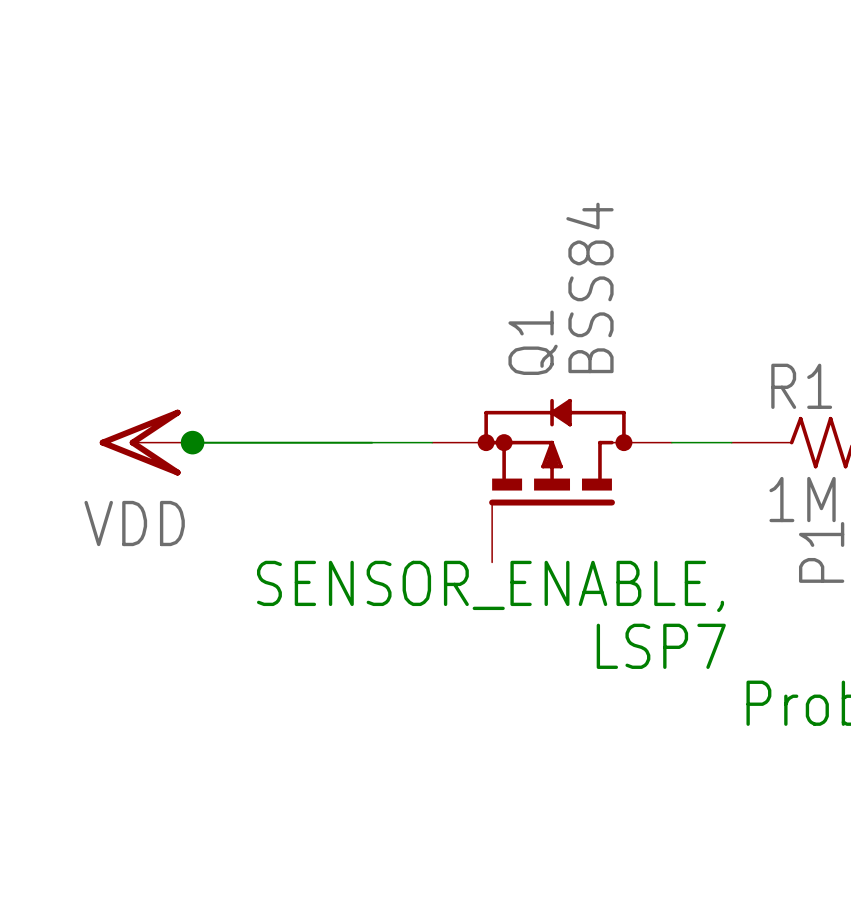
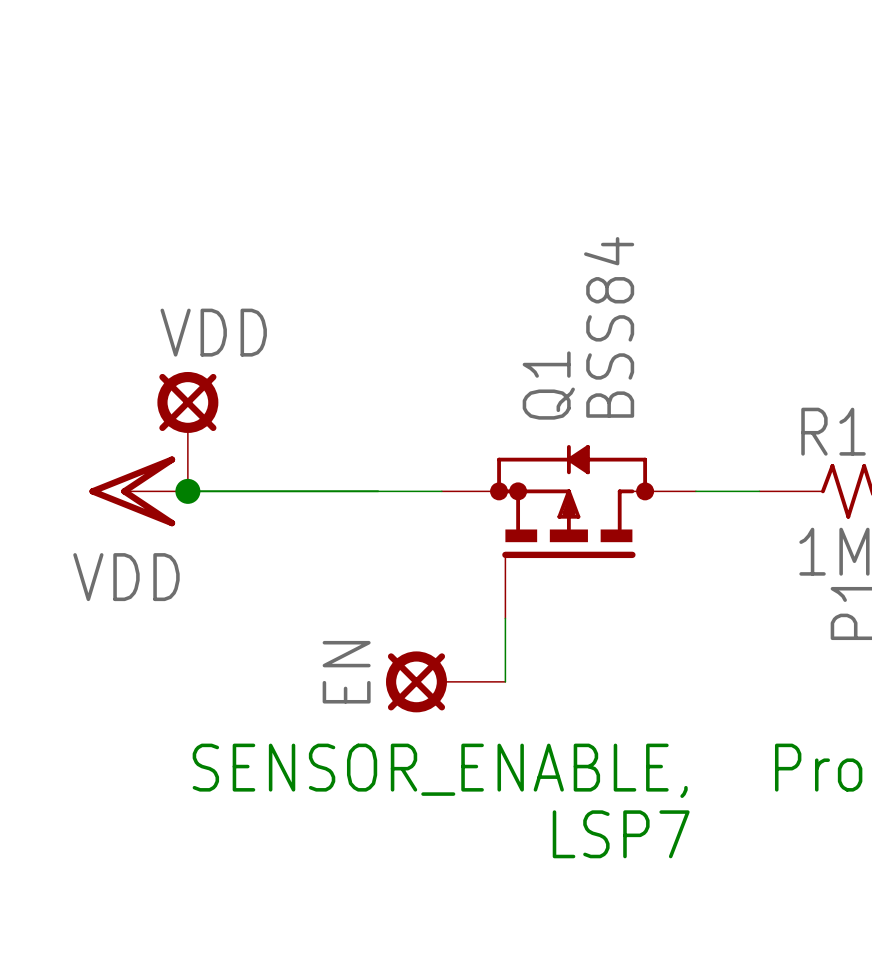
VDD: none -> (187, 431)
wire: none -> (505, 618) (505, 681)
text position: SENSOR_ENABLE, (490, 586) -> SENSOR_ENABLE, (440, 770)
EN: none -> (445, 681)
text position: LSP7 (661, 646) -> LSP7 (621, 834)

